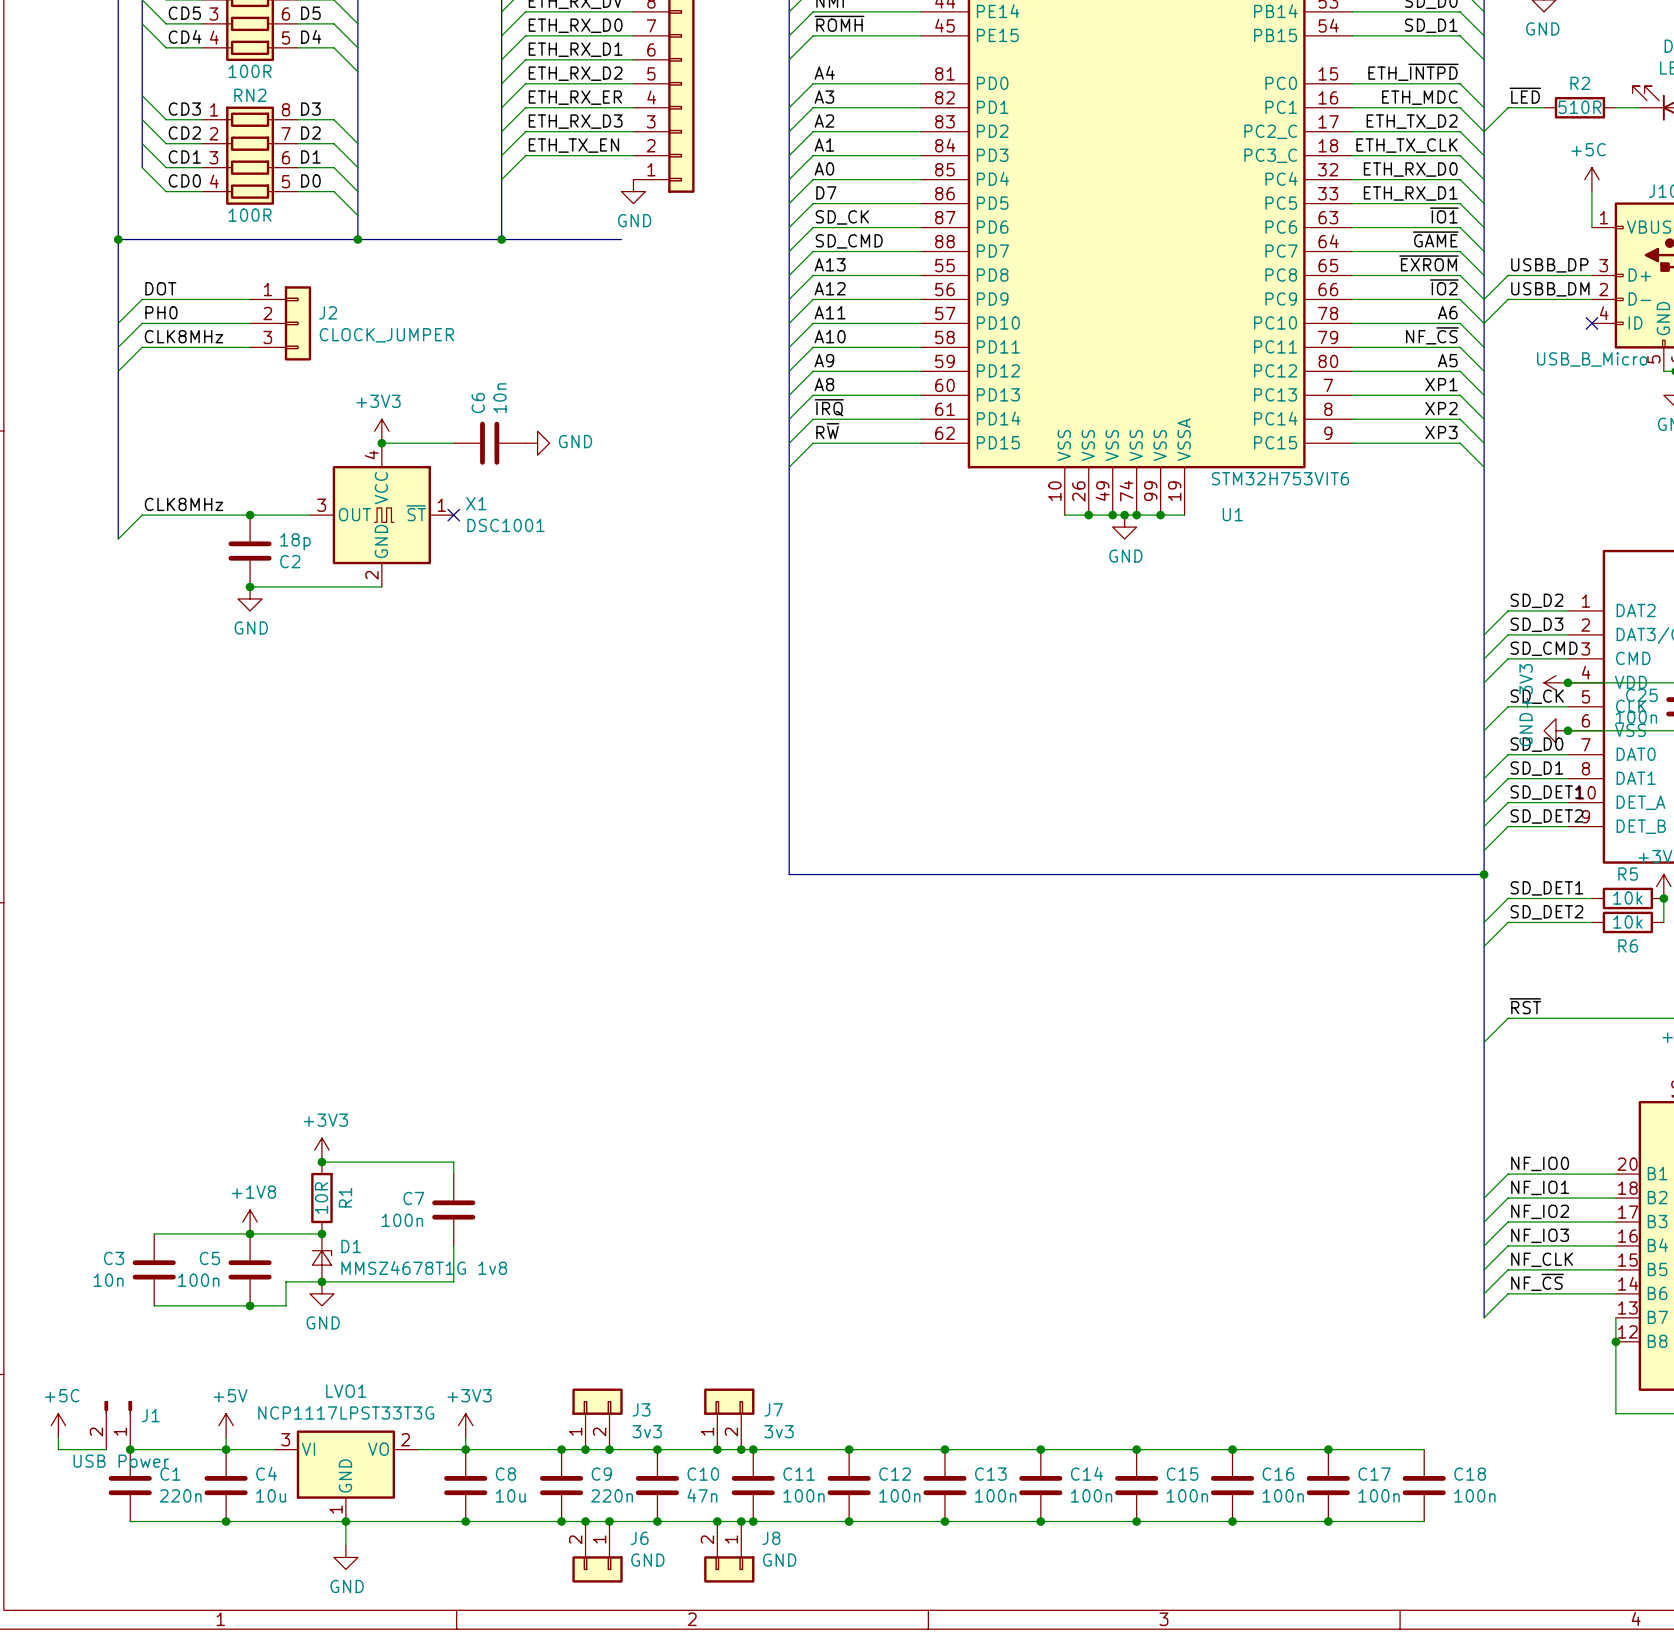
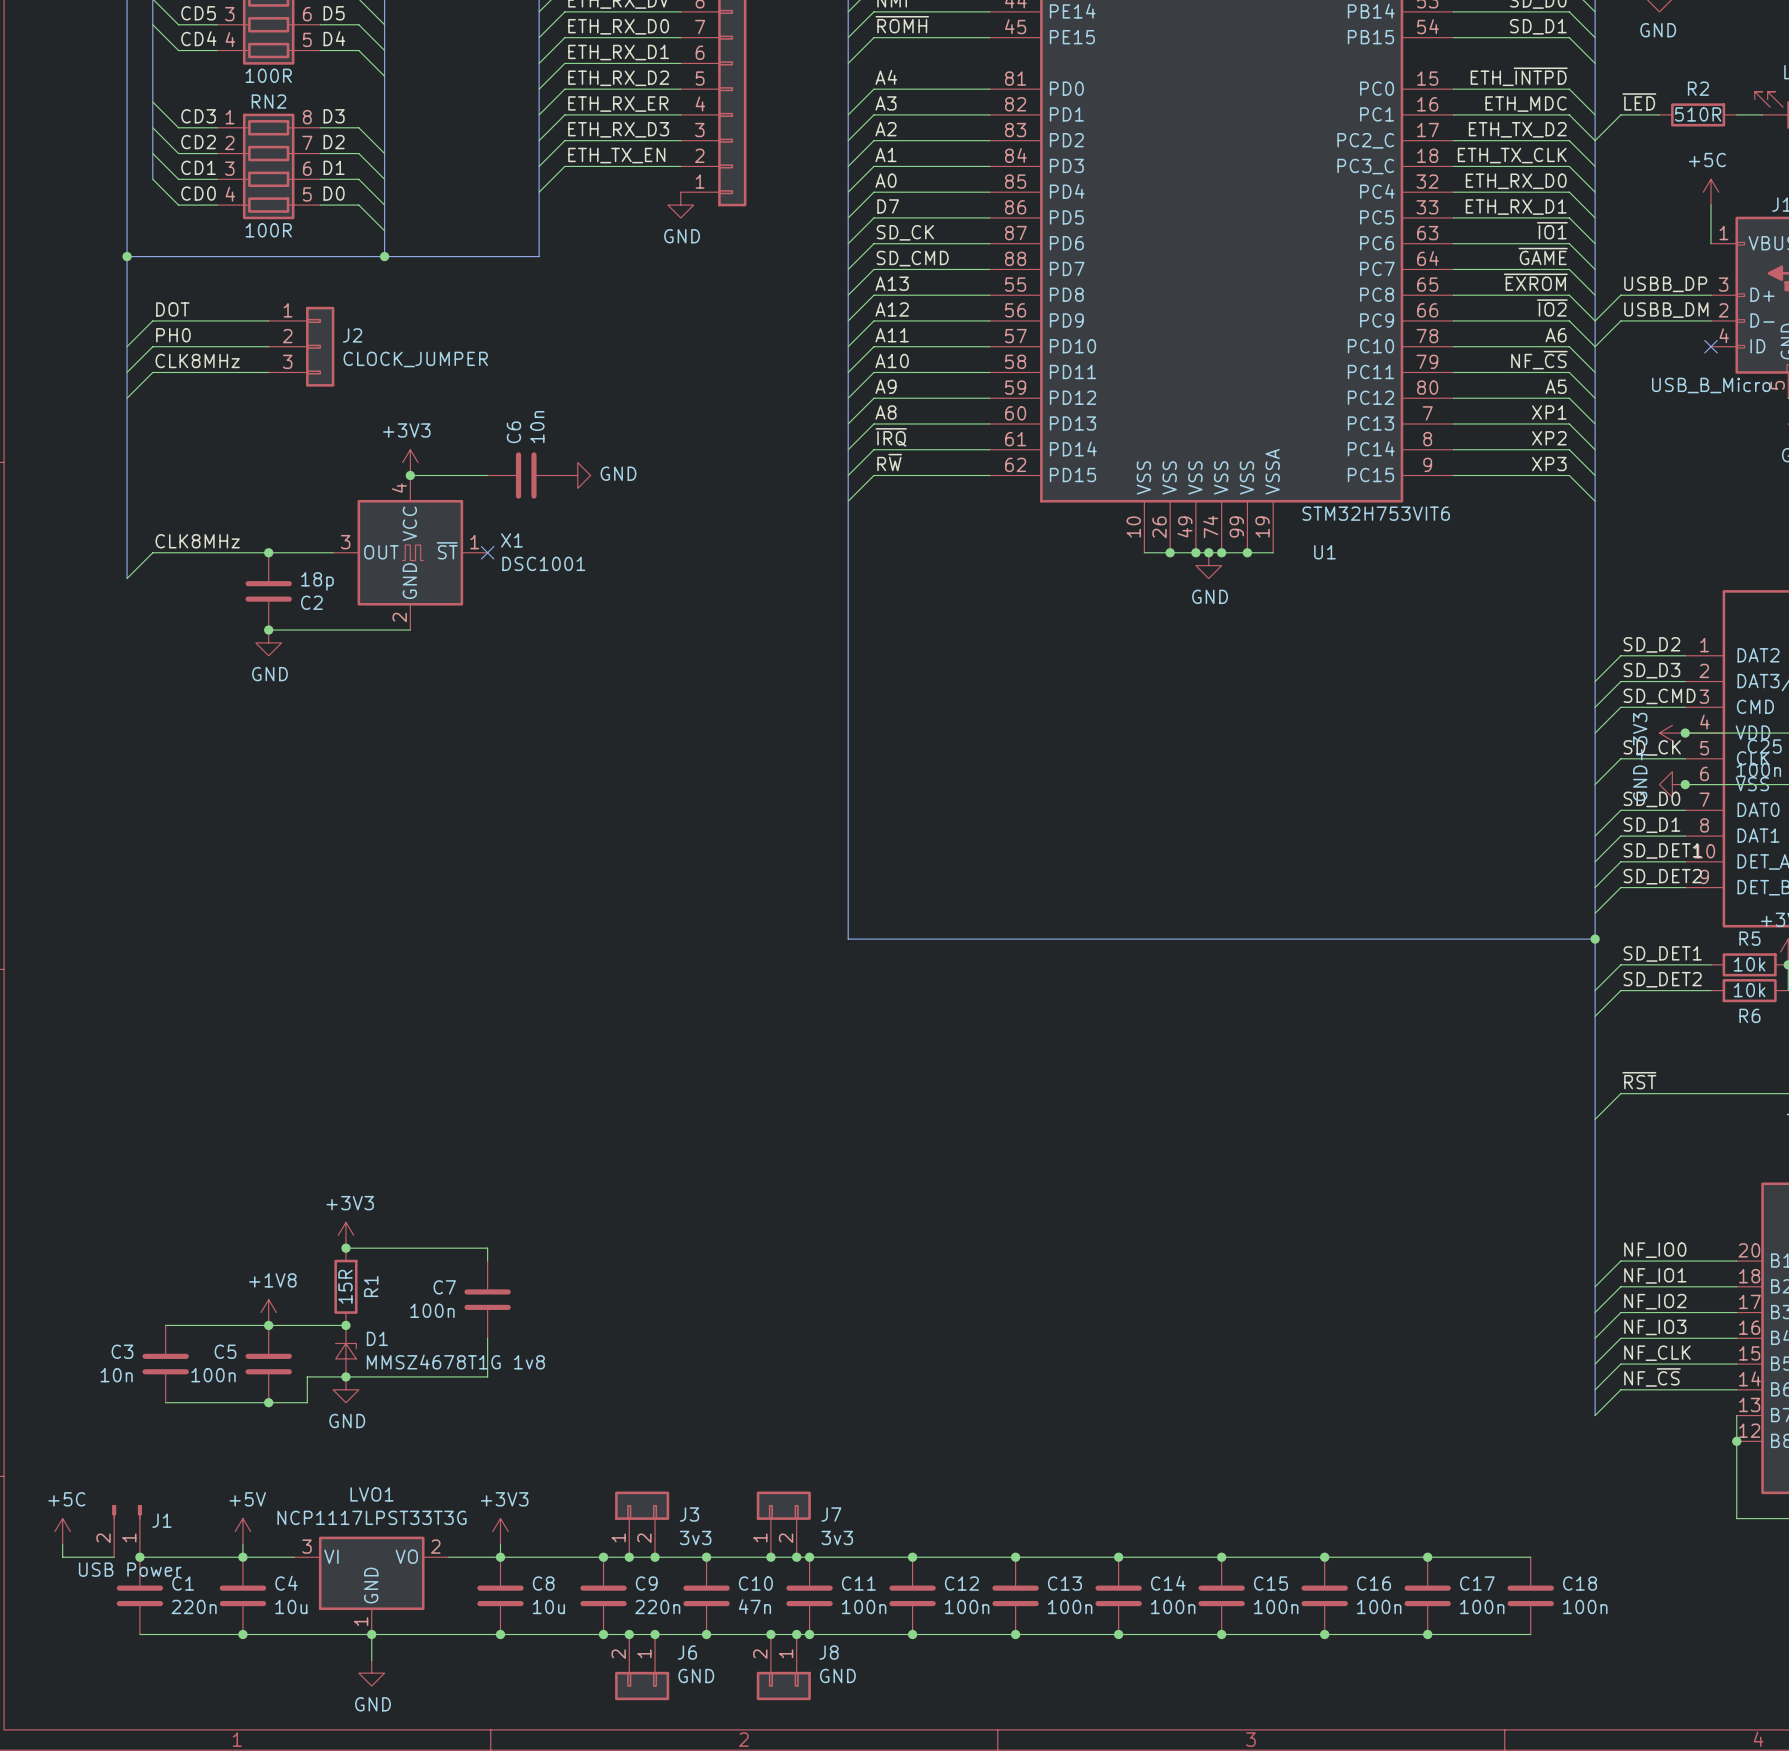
bus: (501, 239) (621, 239) -> none
junction: (501, 239) -> none
R1 value: 10R (321, 1198) -> 15R (345, 1286)

